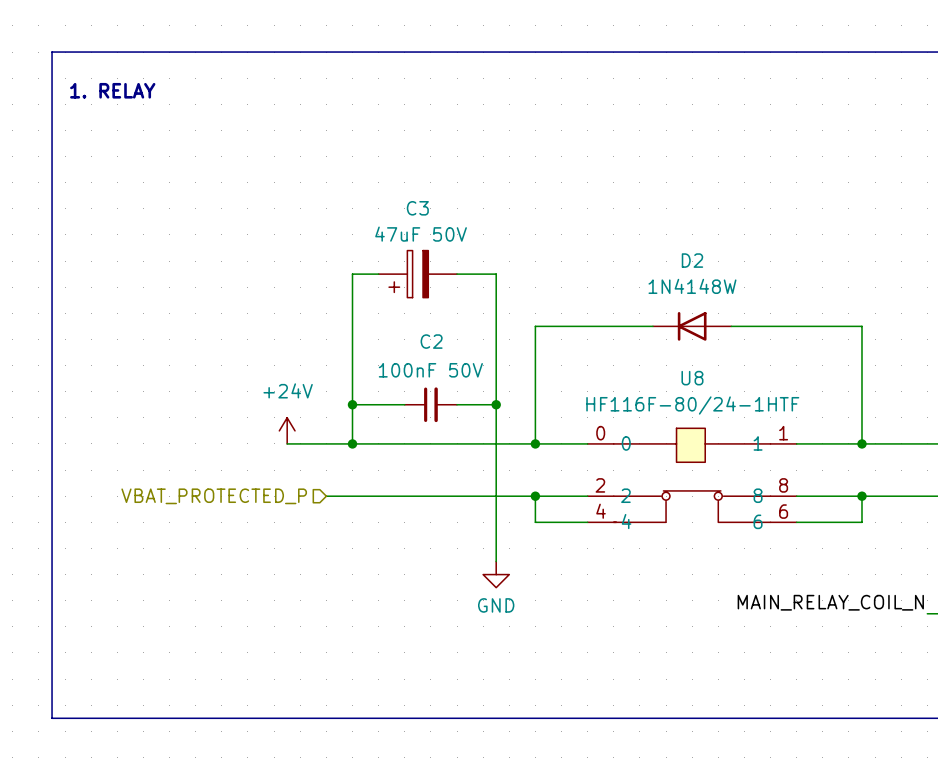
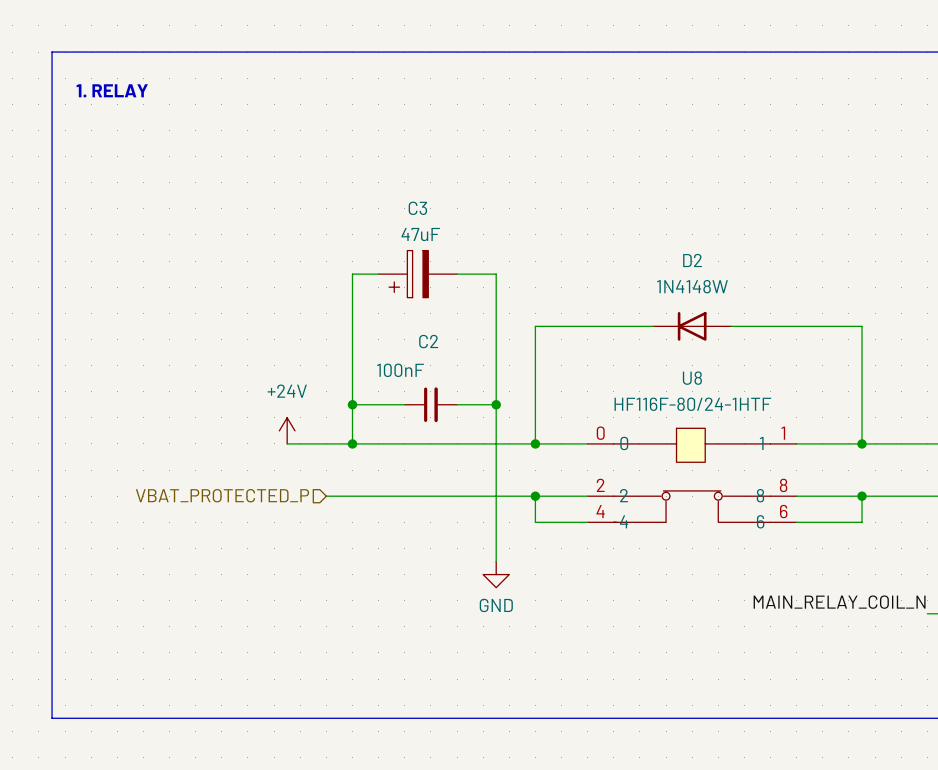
C3 value: 47uF 50V (421, 234) -> 47uF (420, 234)
C2 value: 100nF 50V (430, 370) -> 100nF (400, 370)

